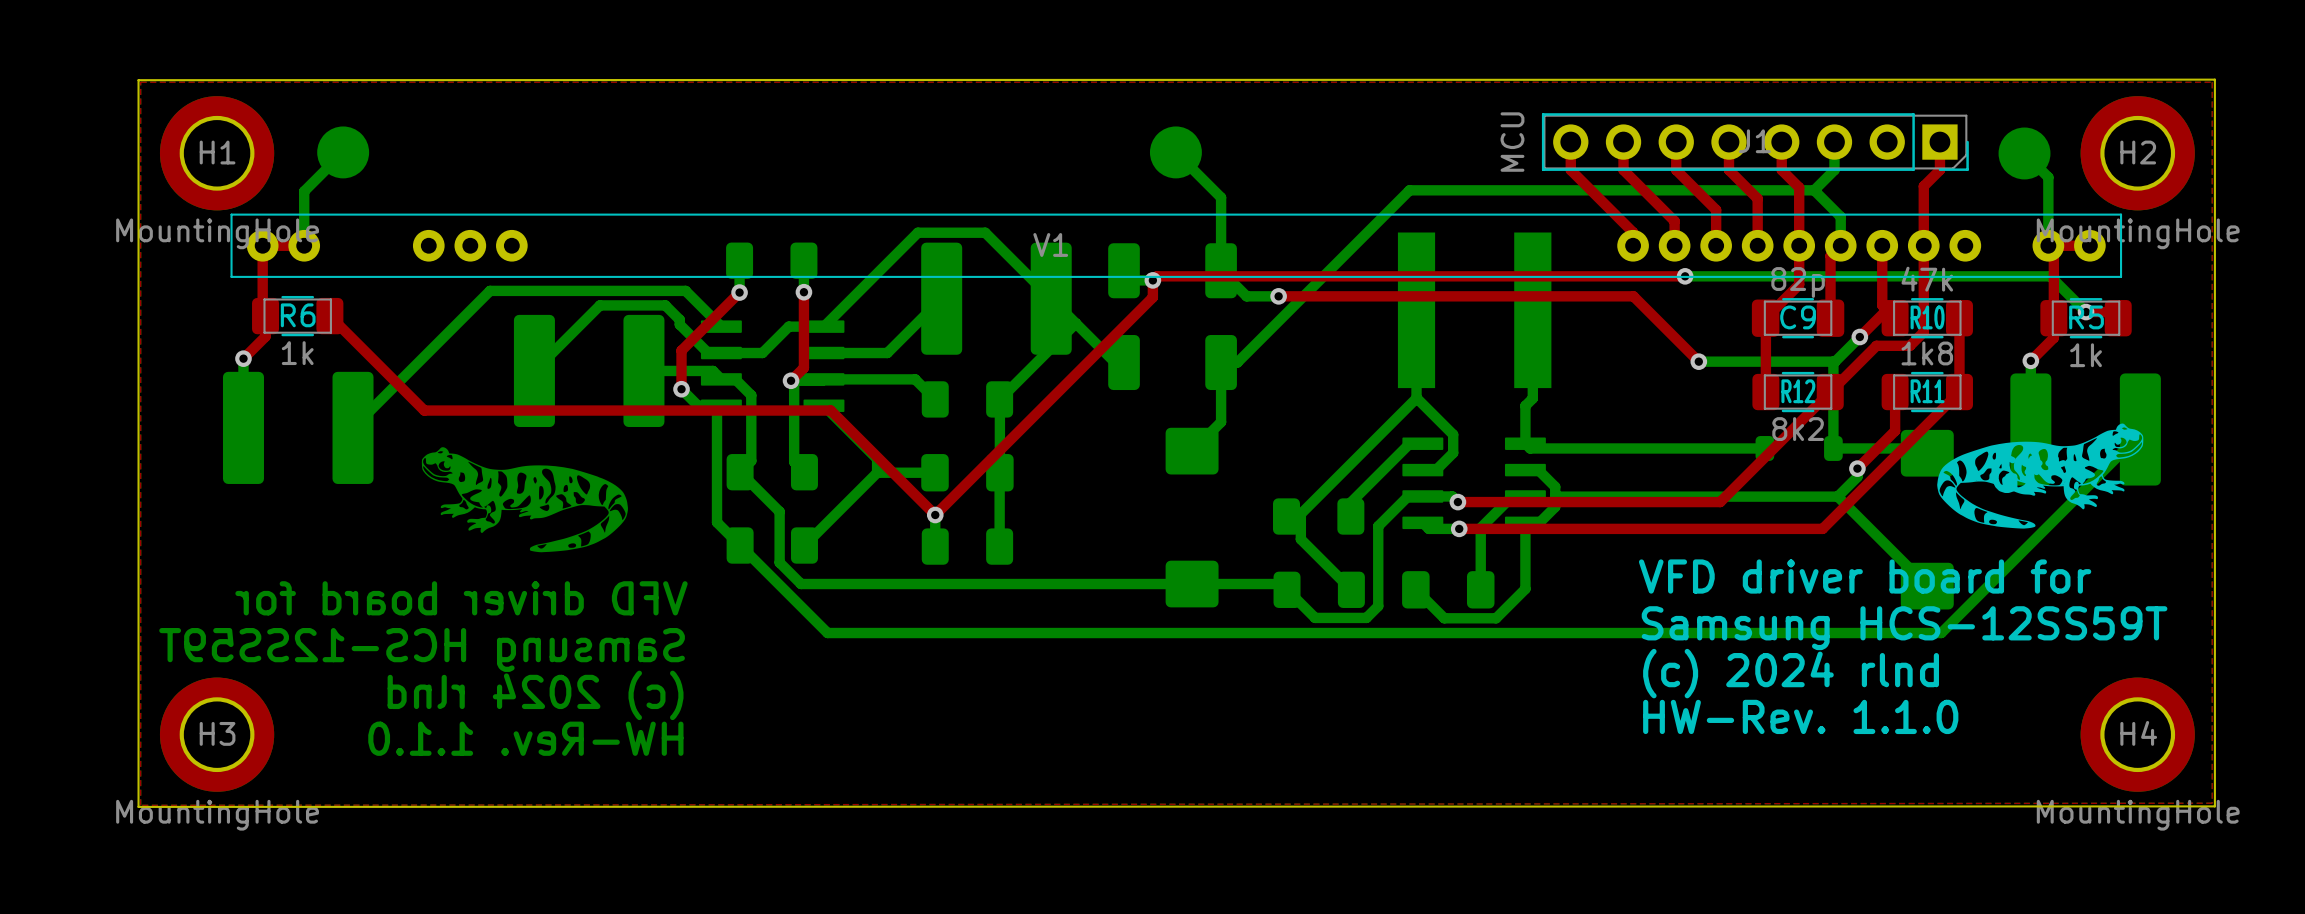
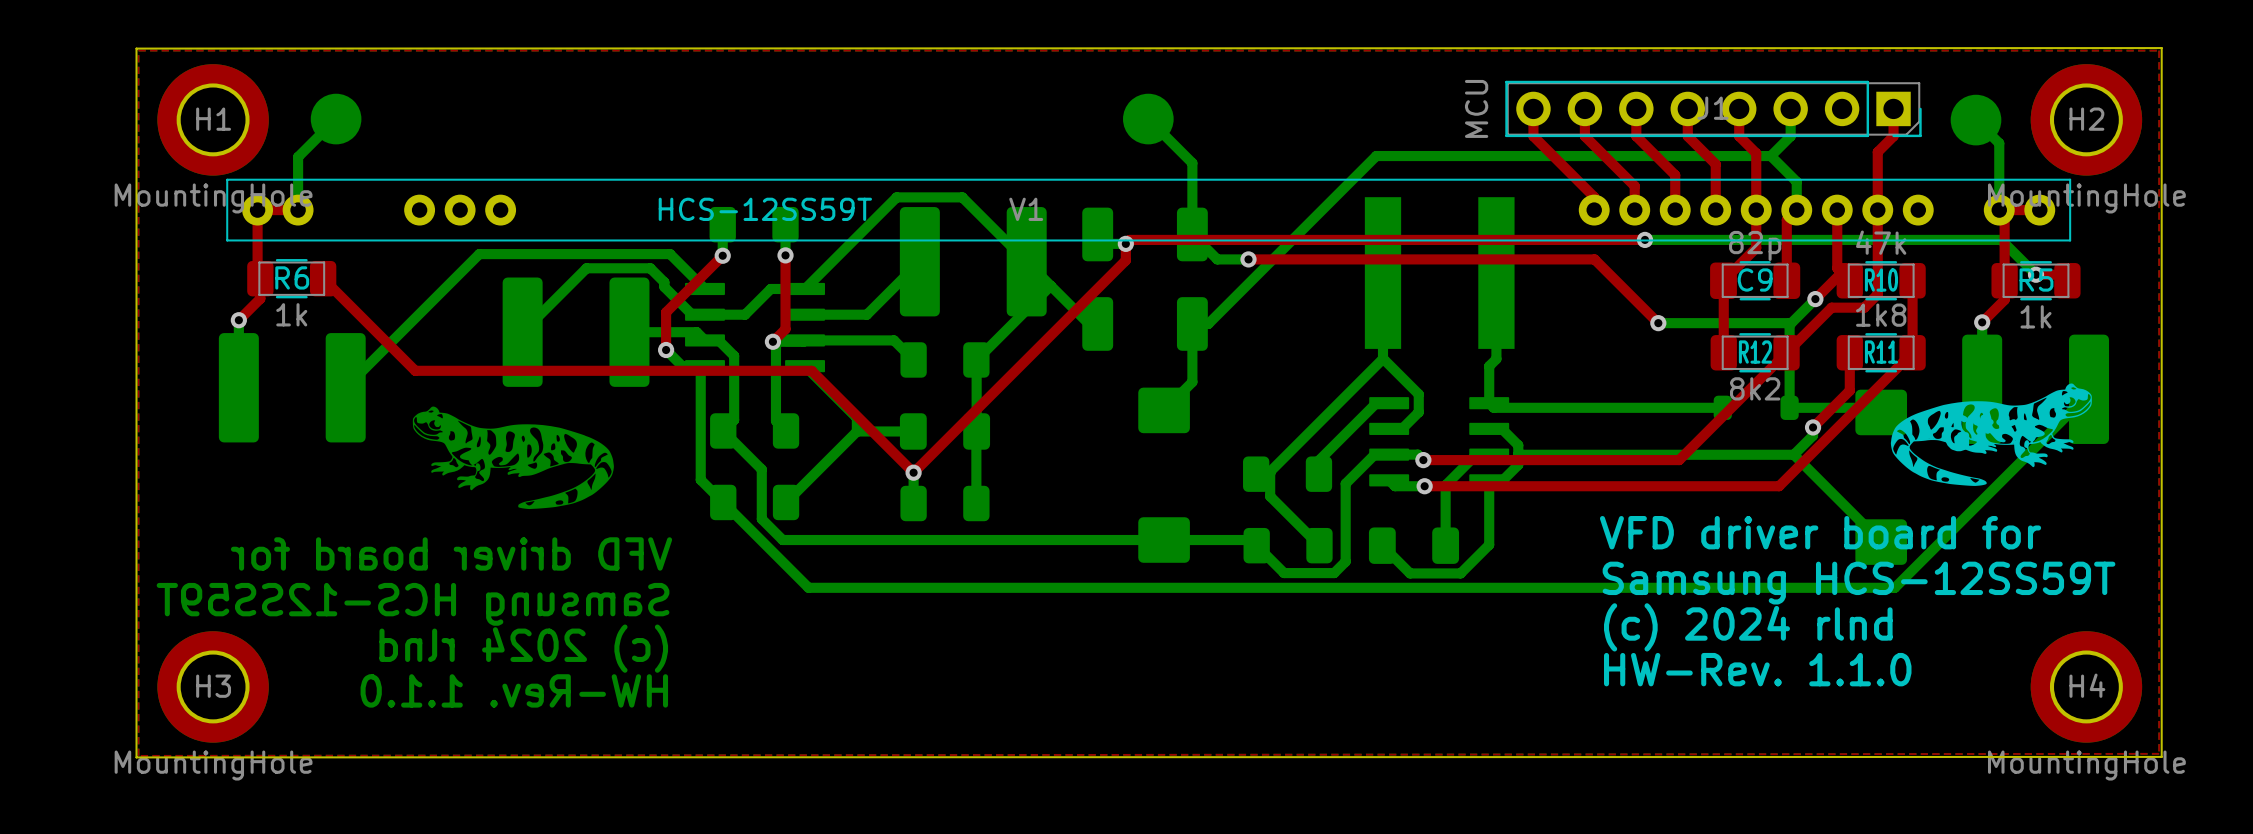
V1 value: none -> HCS-12SS59T (765, 209)

